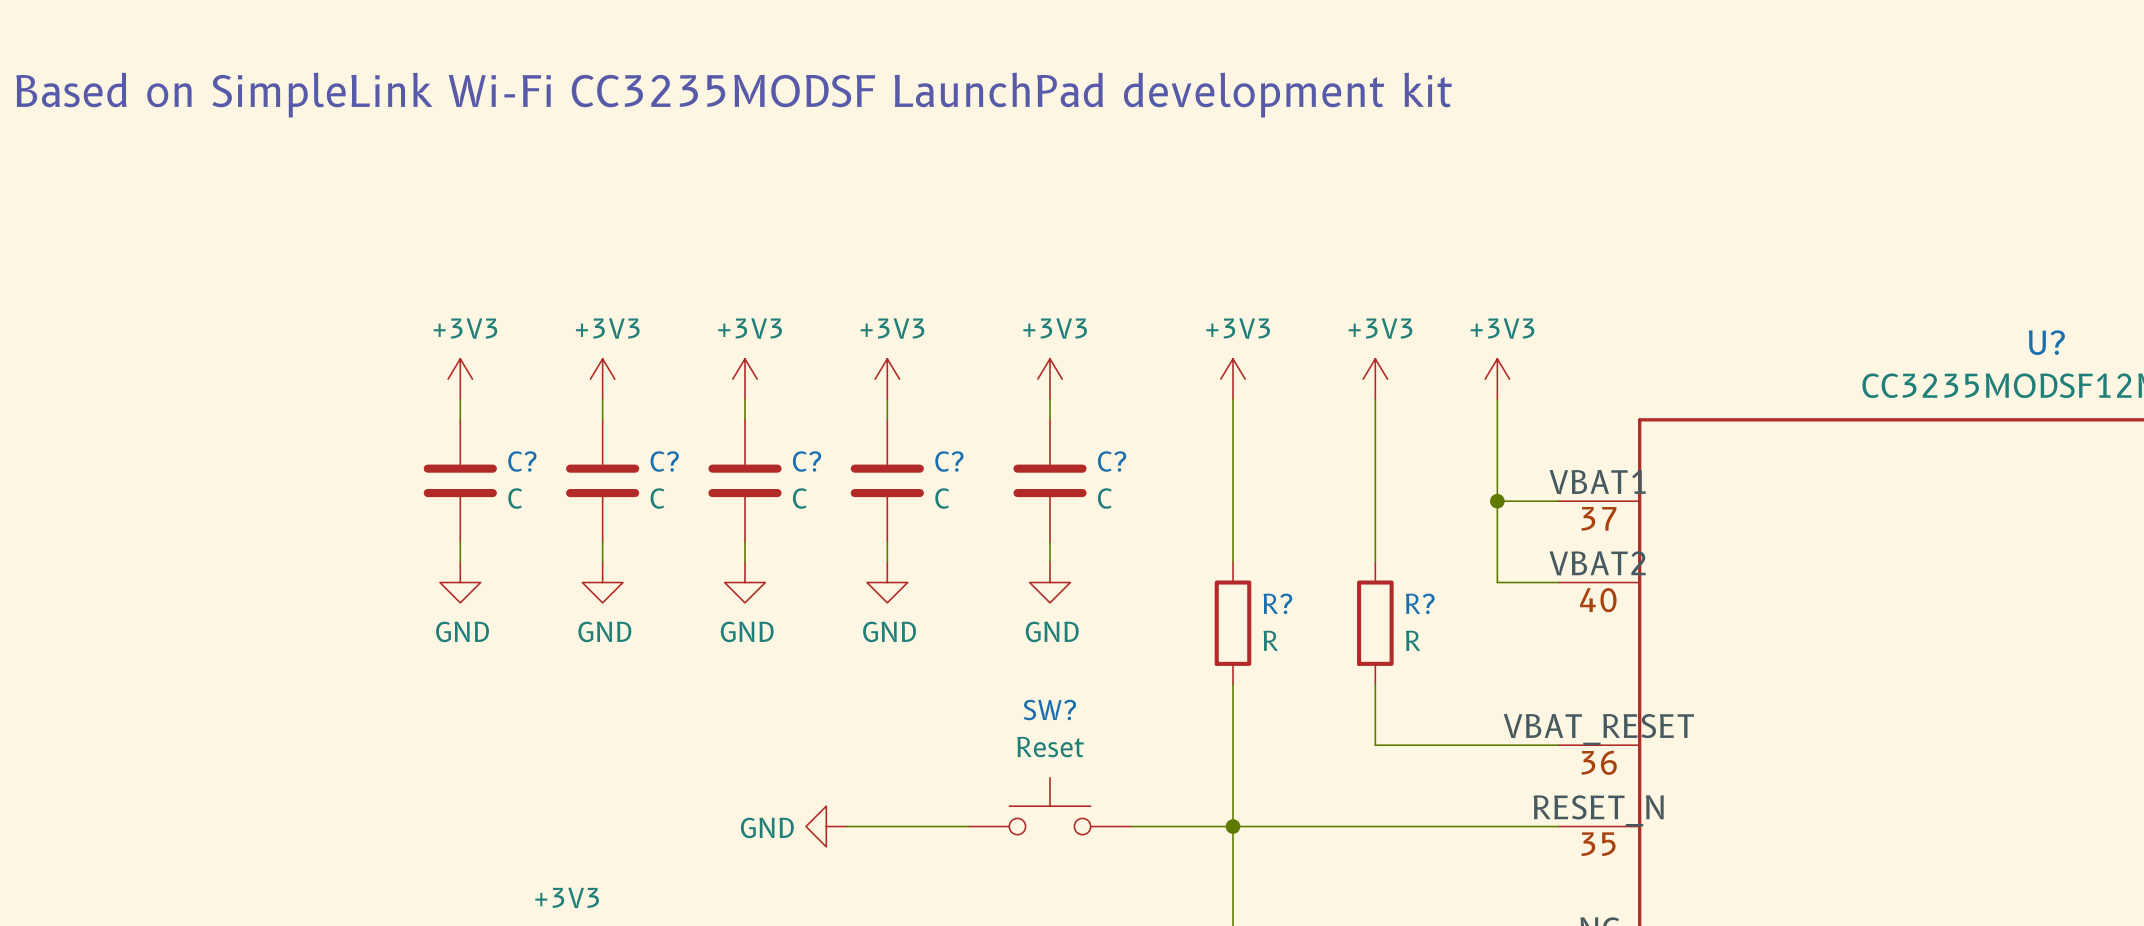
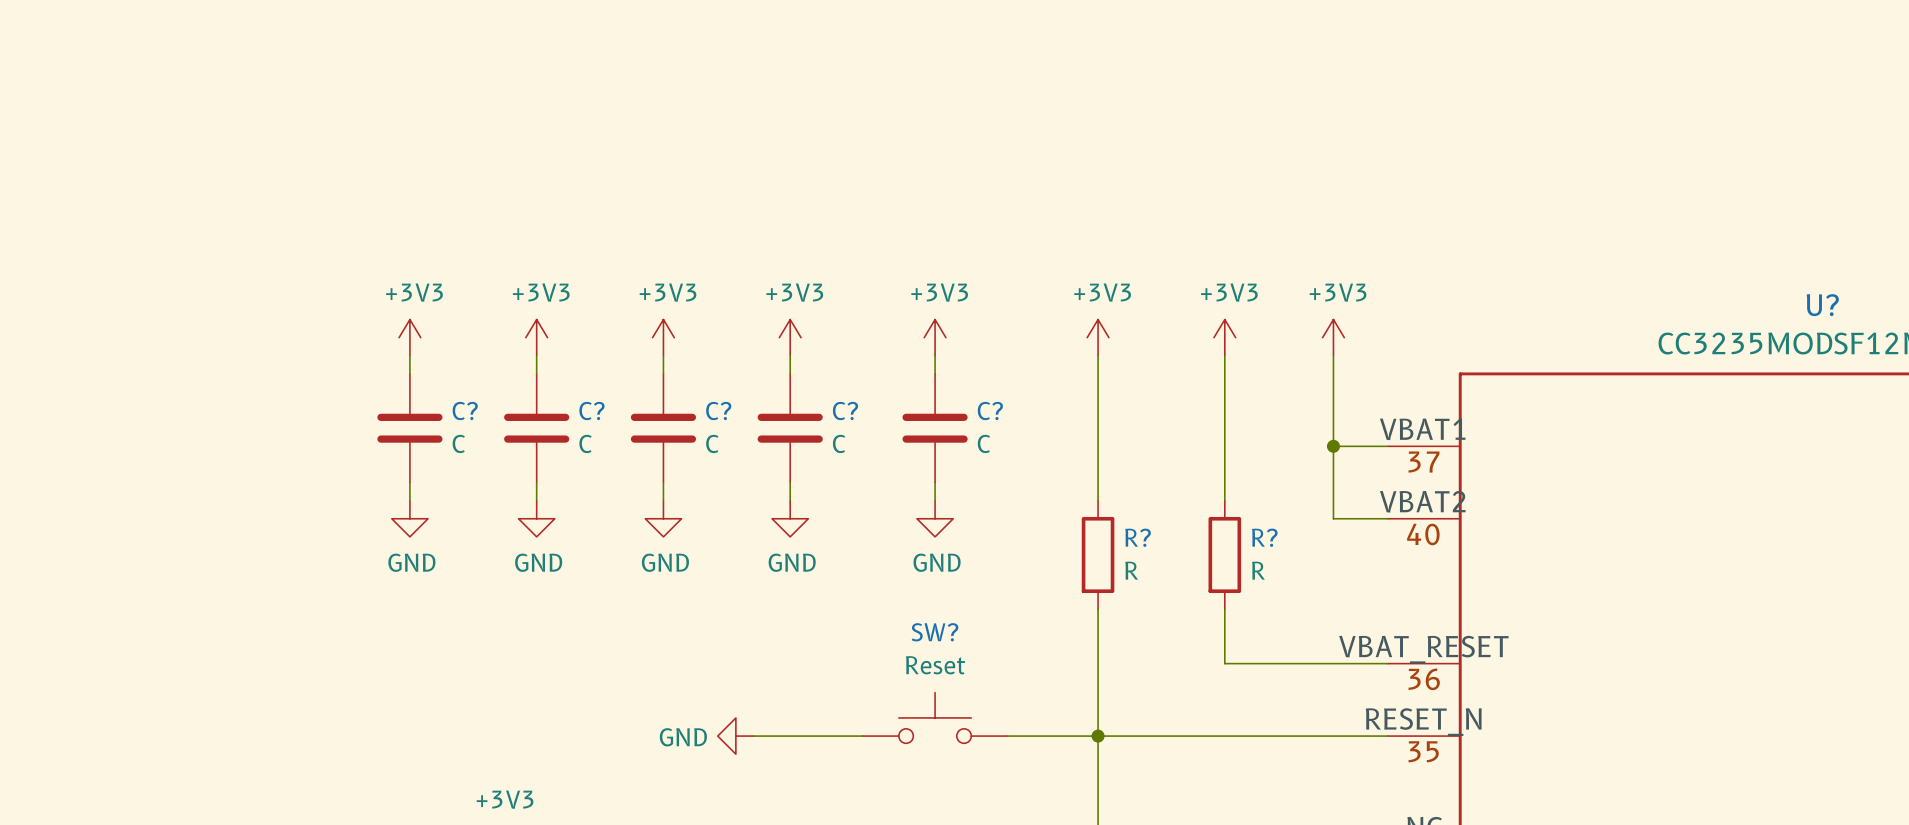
text: Based on SimpleLink Wi-Fi CC3235MODSF LaunchPad development kit (734, 95) -> none

